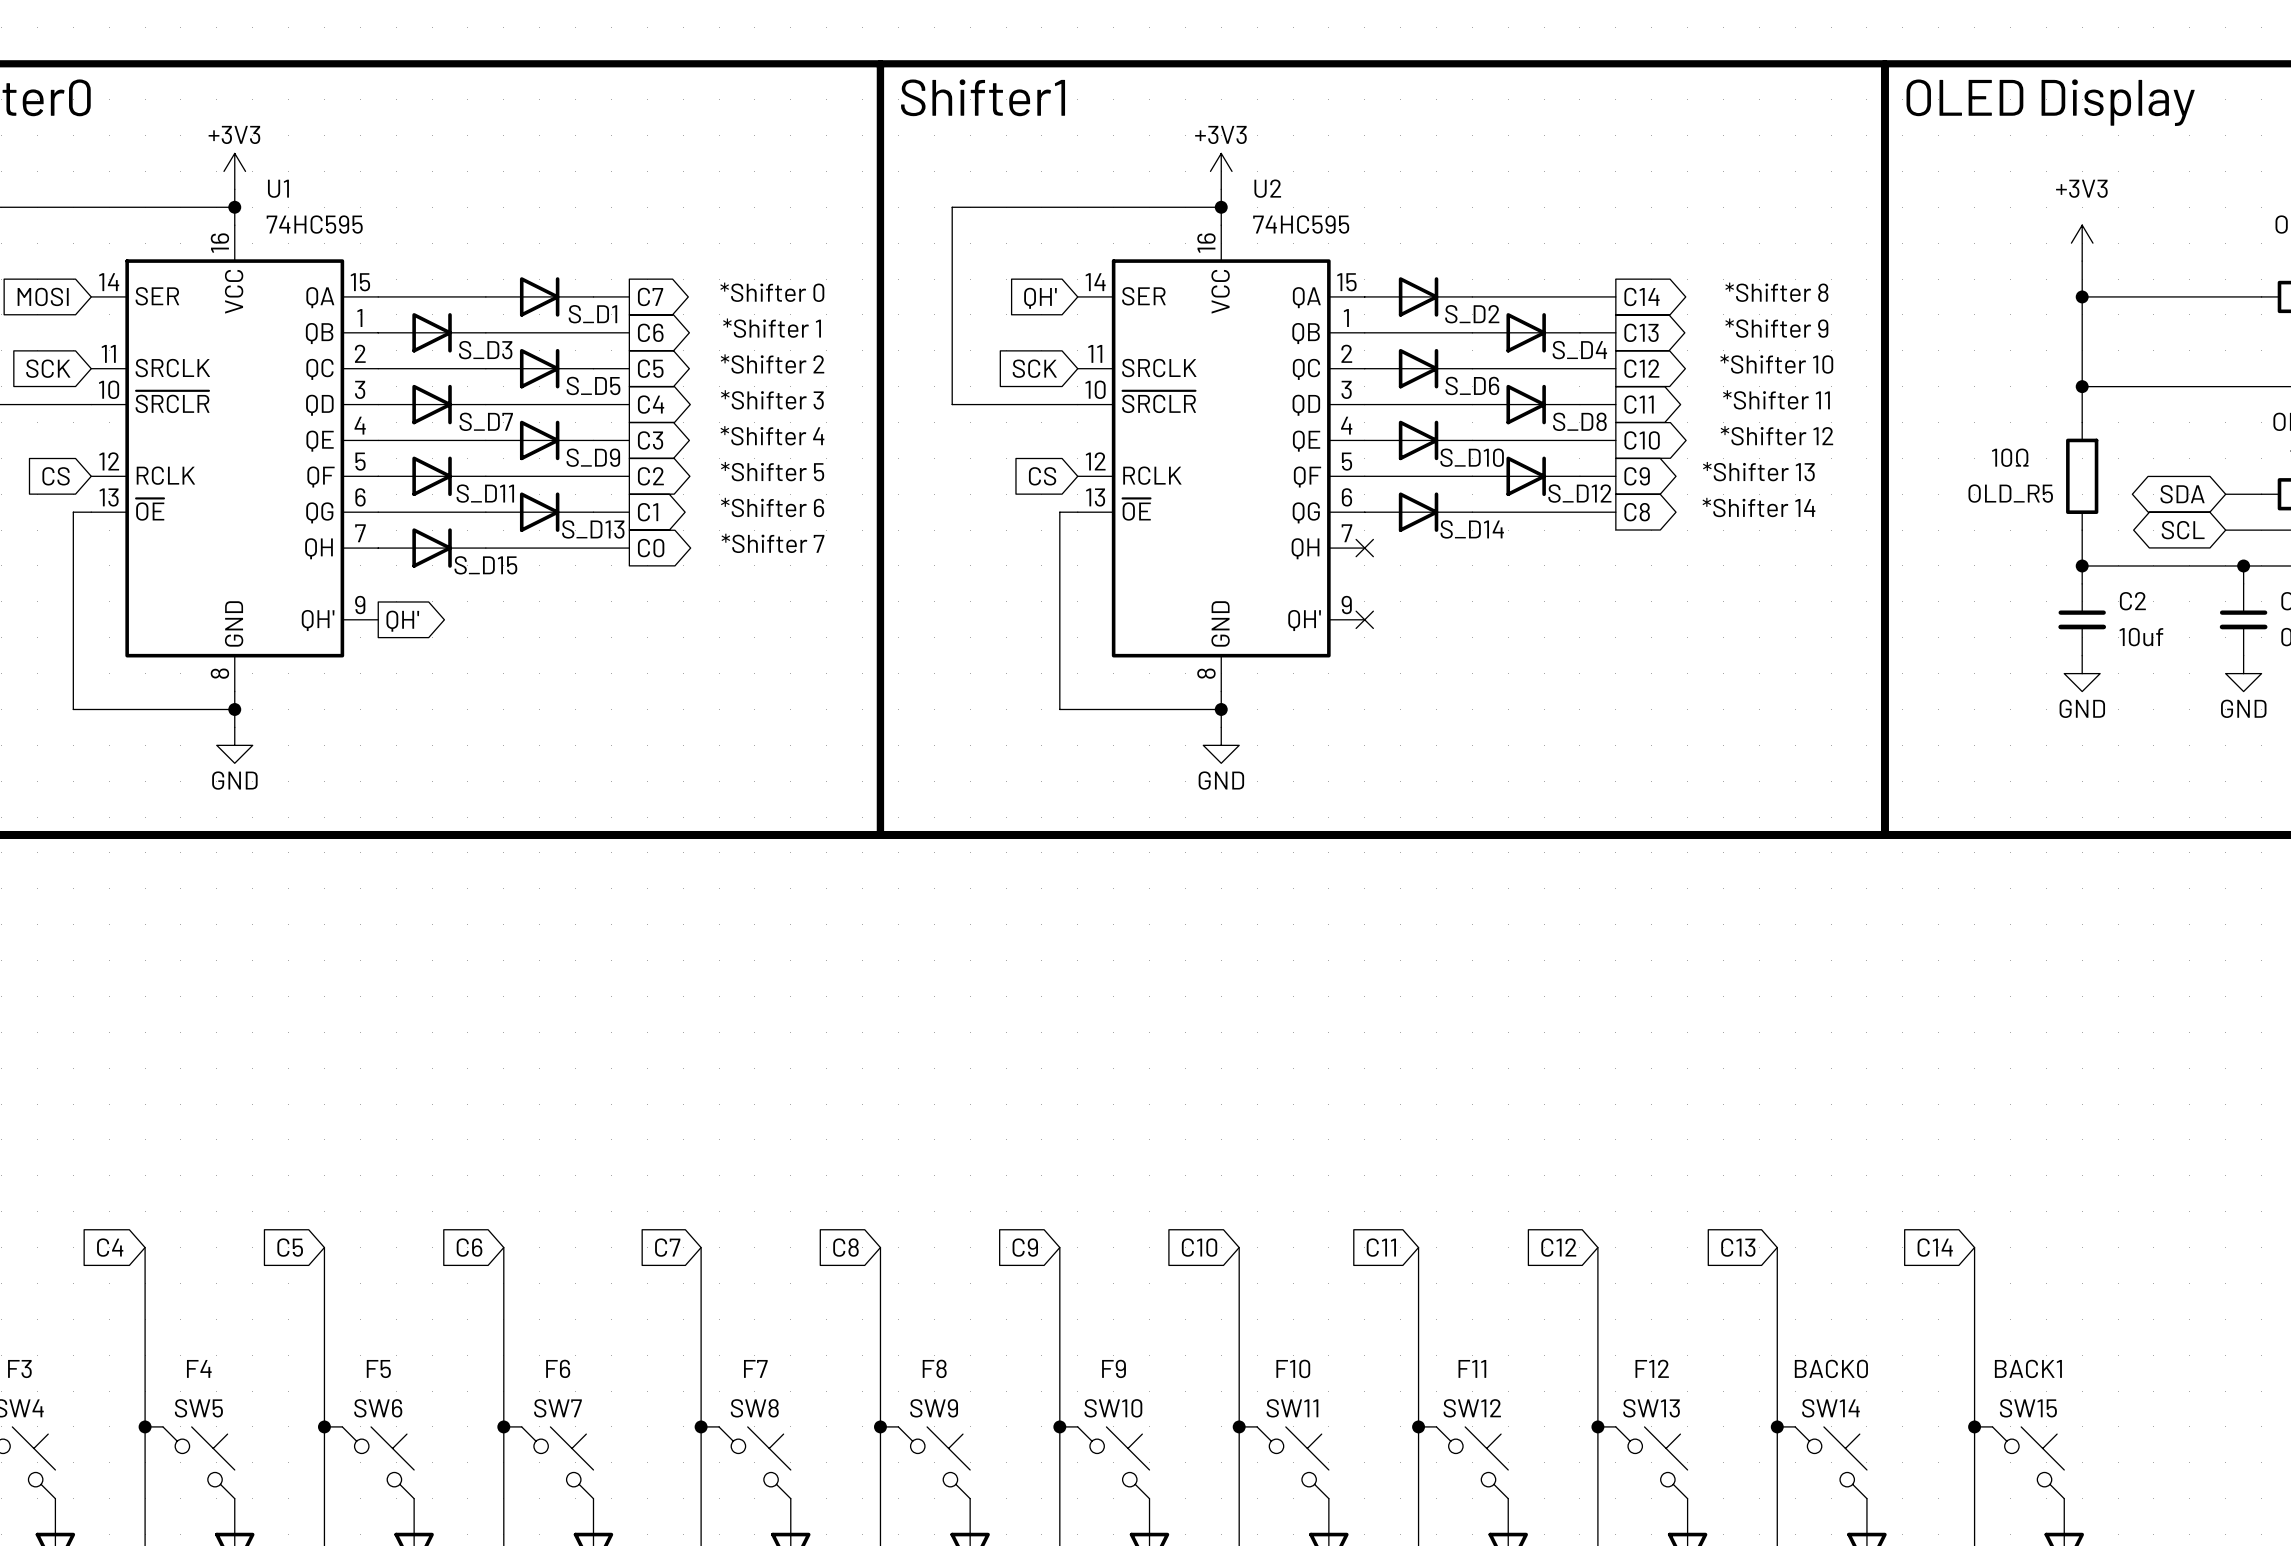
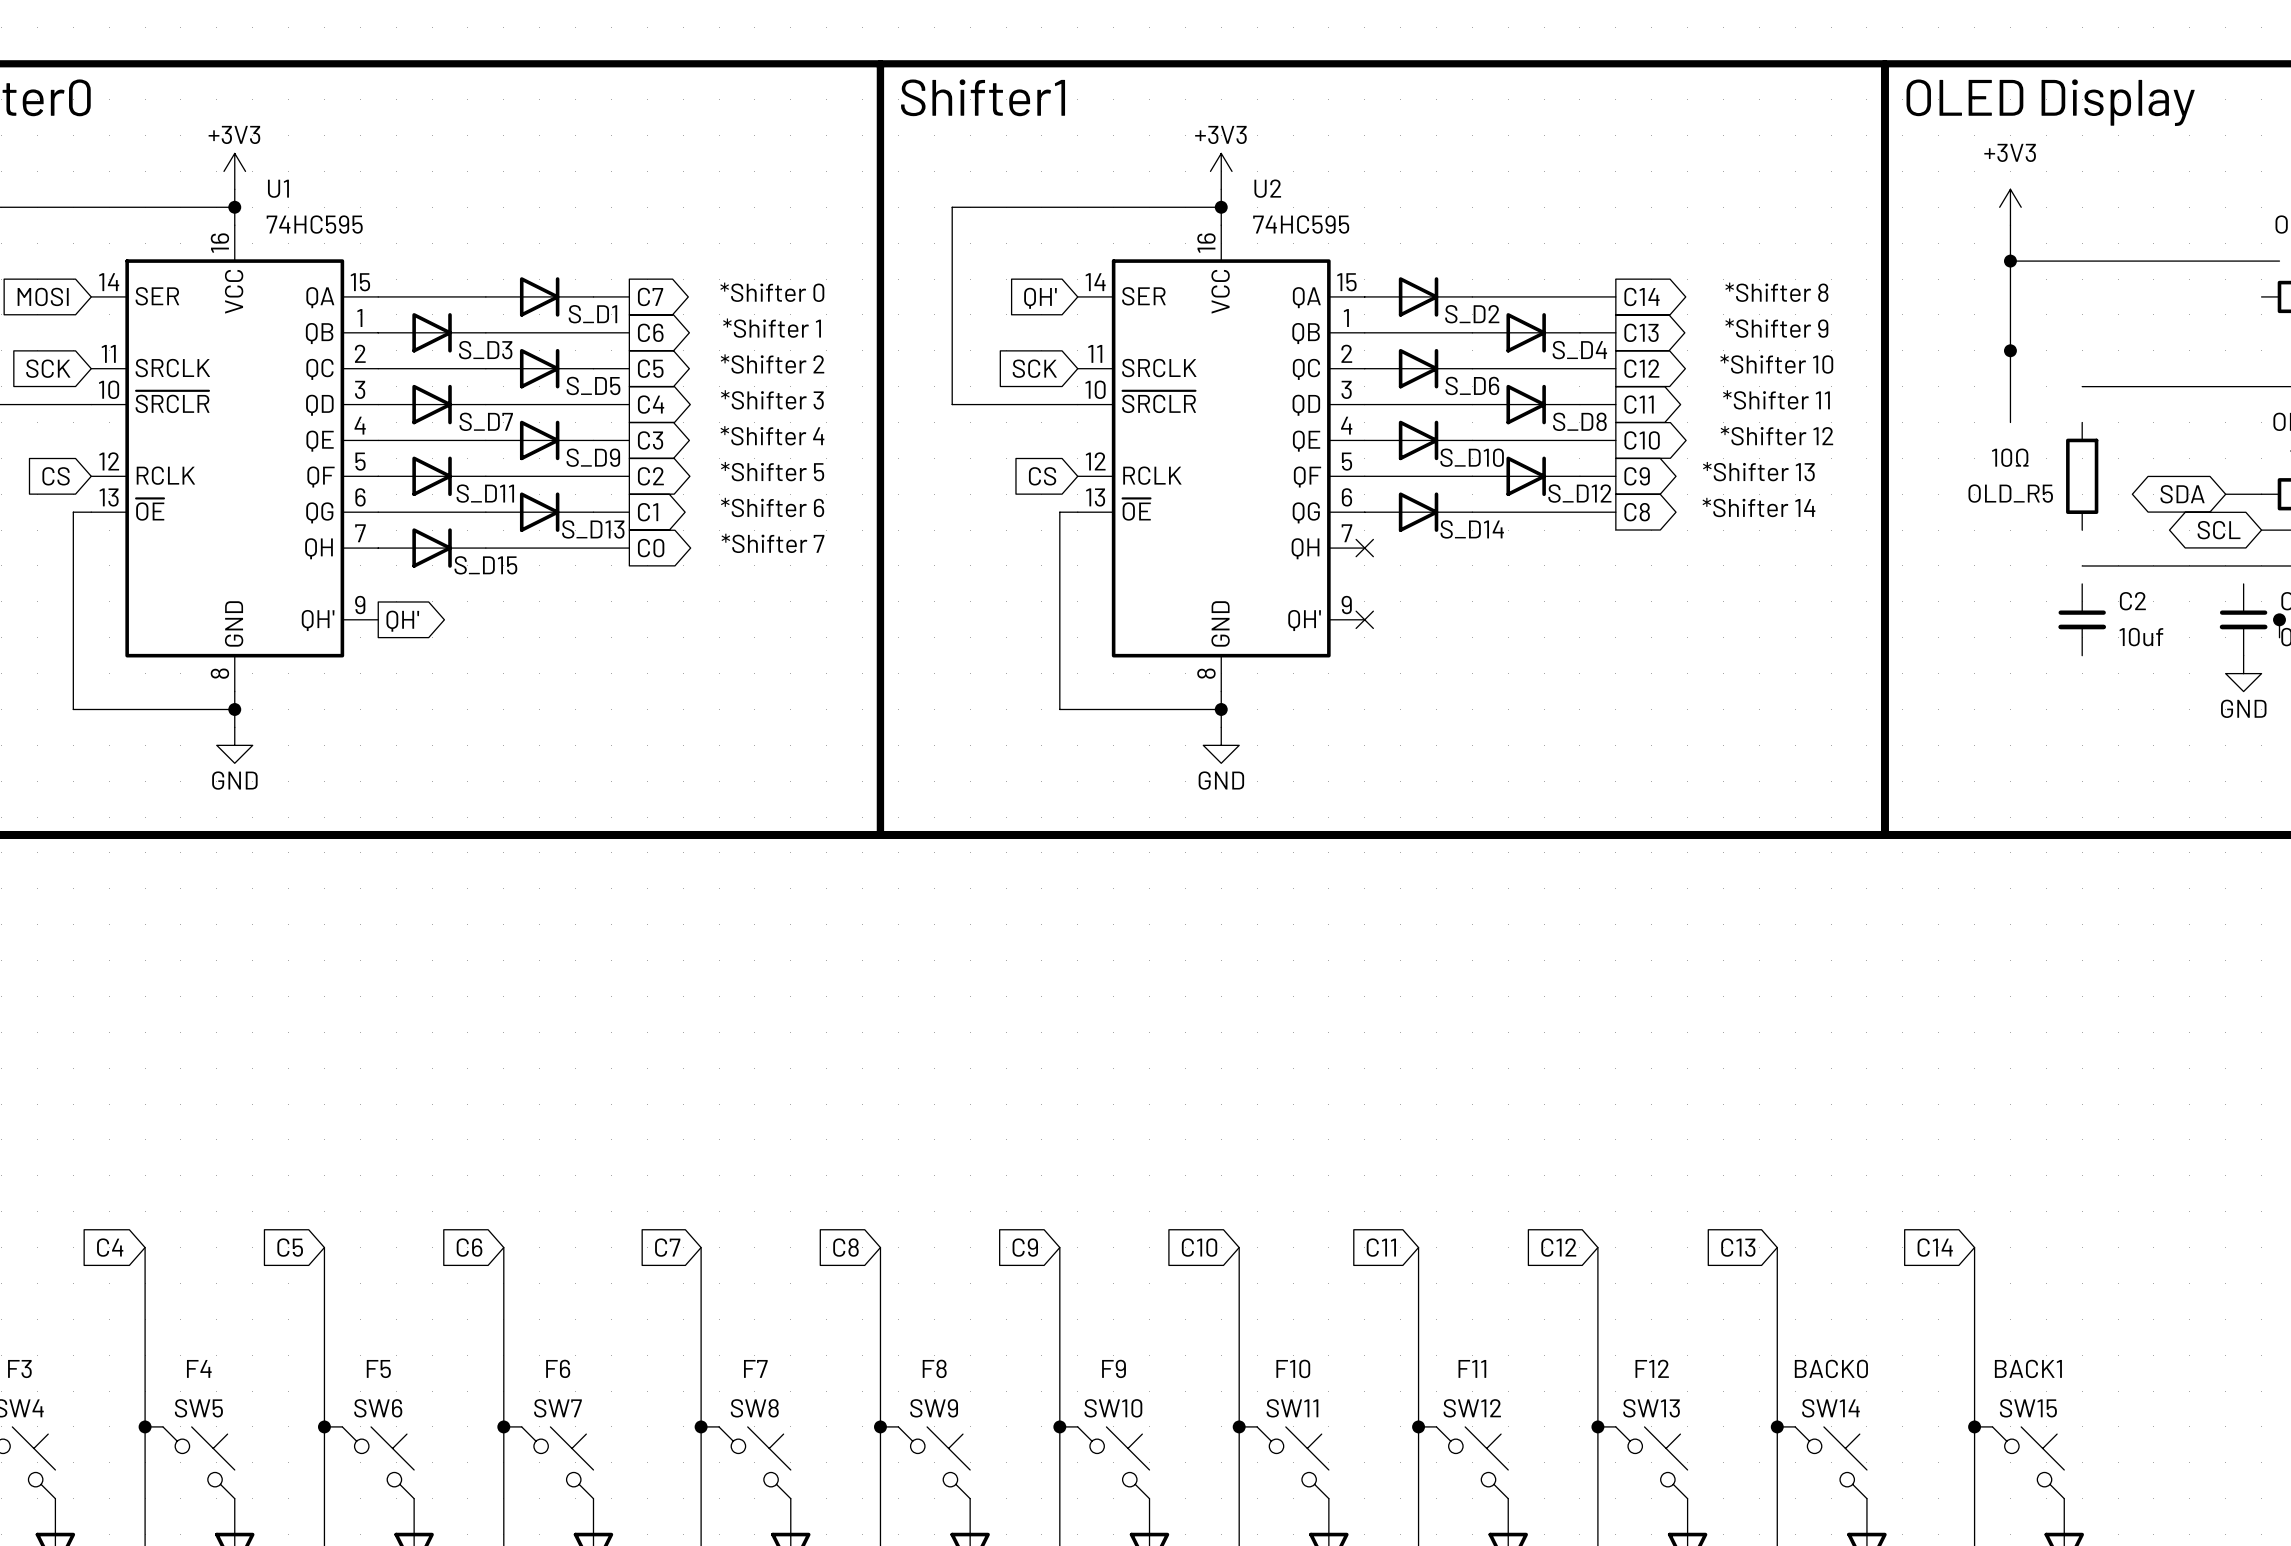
wire: none -> (2010, 225) (2010, 422)
power symbol position: +3V3 (2082, 243) -> +3V3 (2010, 207)
wire: none -> (2010, 261) (2279, 261)
junction: none -> (2010, 261)
wire: (2082, 261) (2082, 422) -> none
wire: (2082, 296) (2261, 296) -> none
junction: (2082, 296) -> none
junction: none -> (2010, 350)
junction: (2082, 386) -> none
wire: (2082, 530) (2082, 583) -> none
global label position: SCL (2183, 530) -> SCL (2219, 530)
wire: (2225, 530) (2261, 530) -> none
junction: (2082, 565) -> none
wire: (2243, 565) (2243, 583) -> (2279, 619) (2279, 637)
junction position: (2243, 565) -> (2279, 619)
power symbol: GND (2082, 673) -> none

